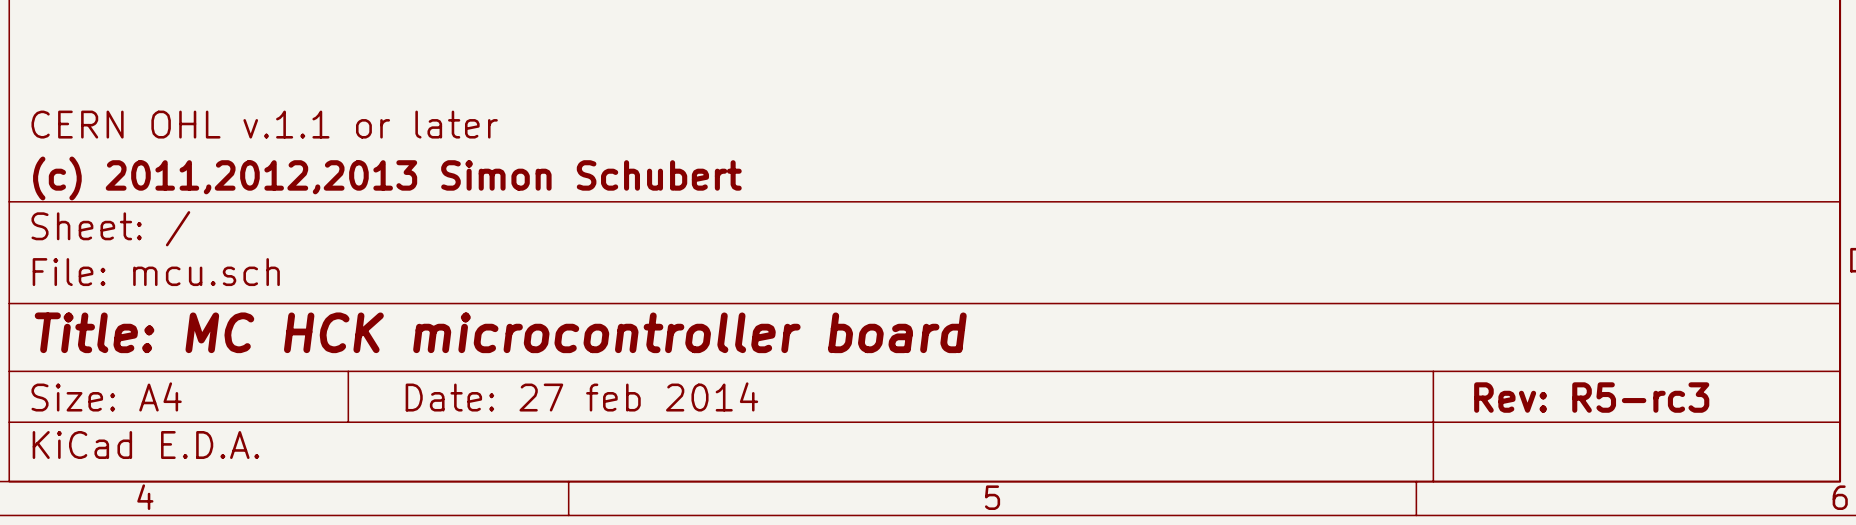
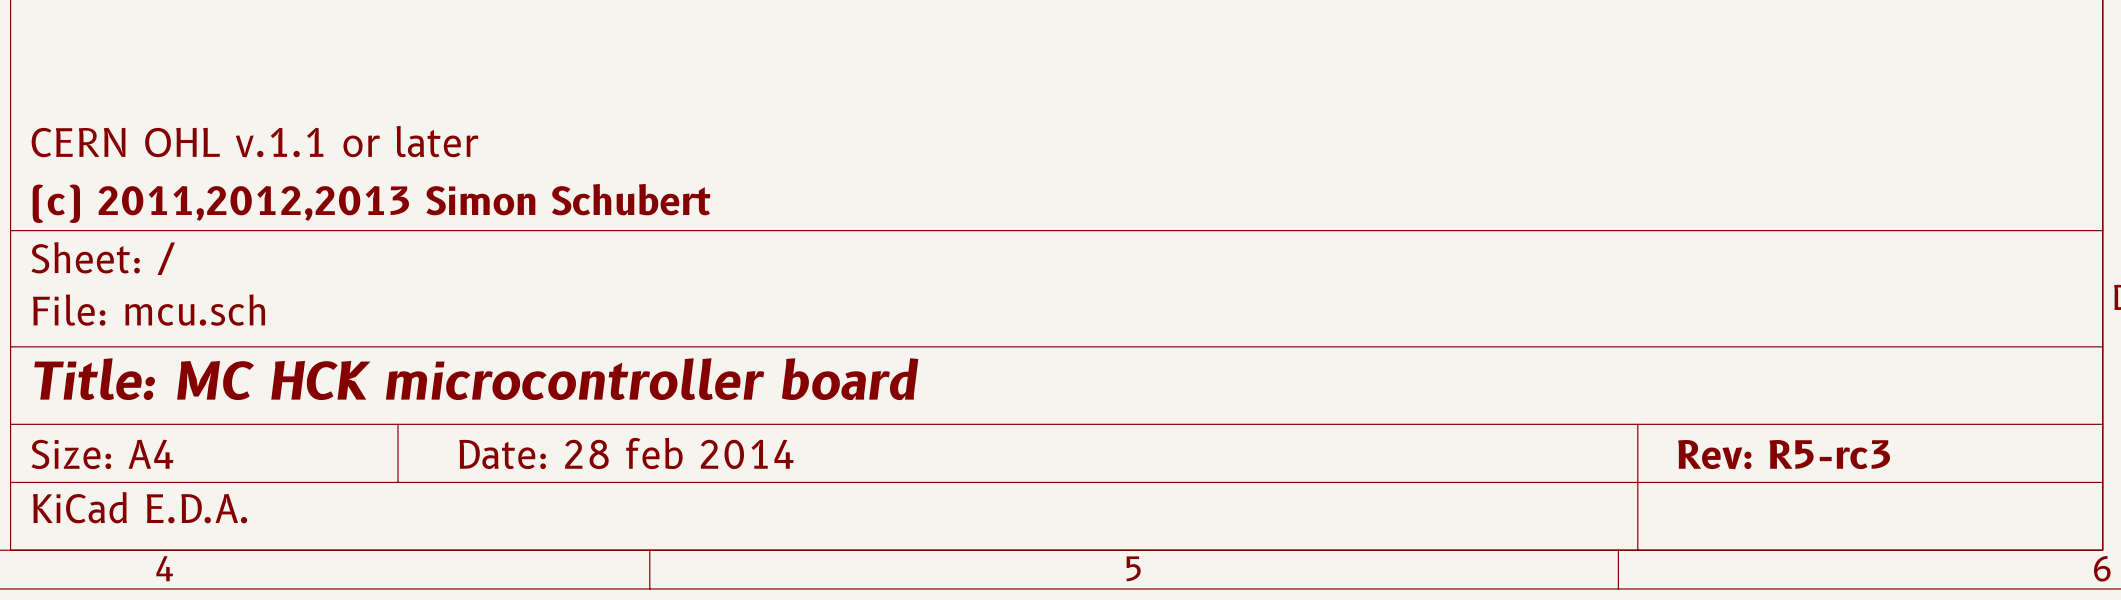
title block: Date: 27 feb 2014 (581, 396) -> Date: 28 feb 2014 (626, 453)

